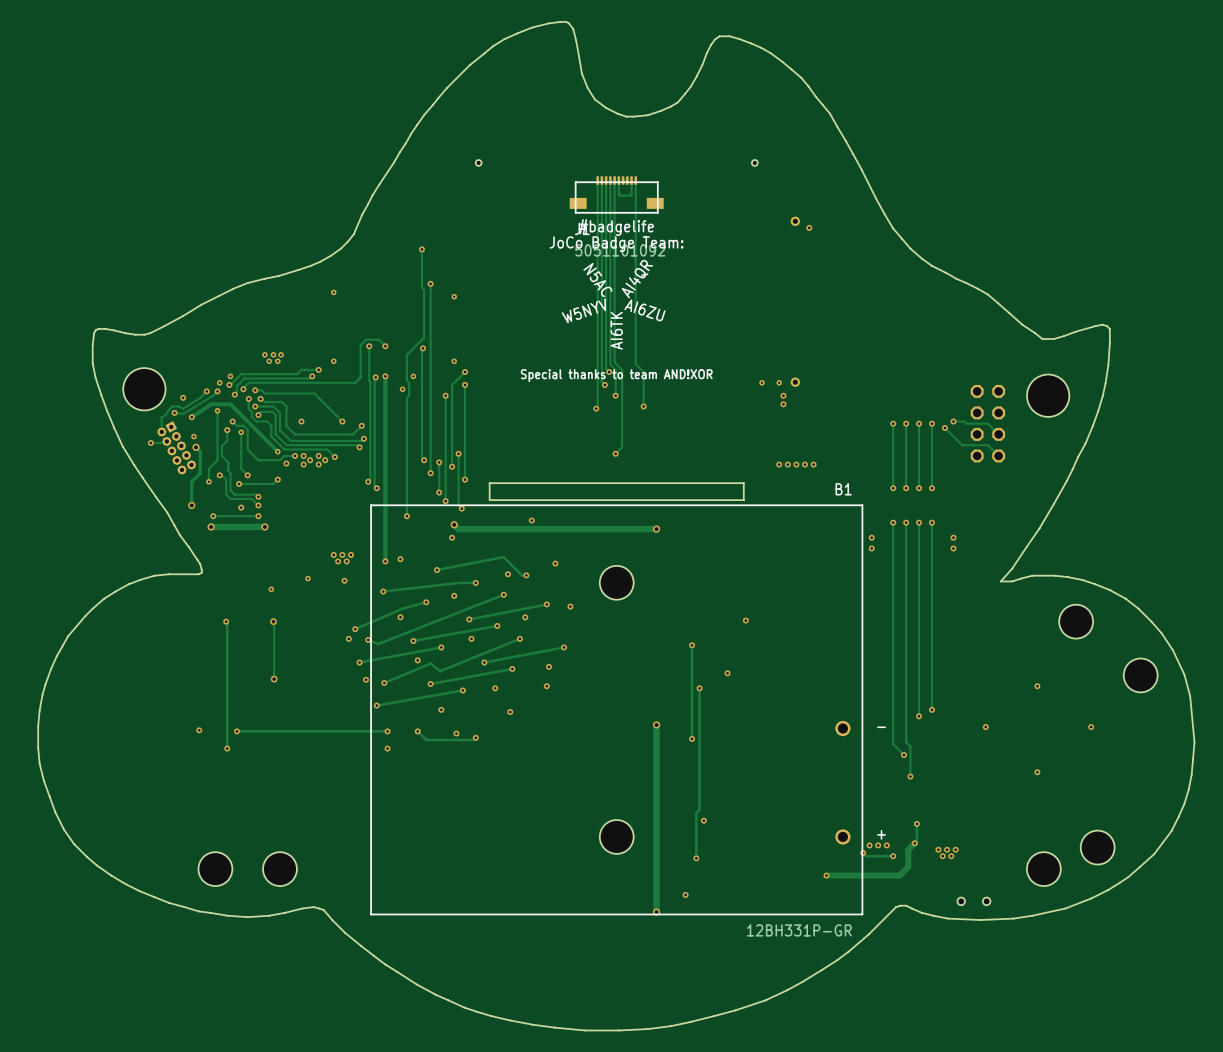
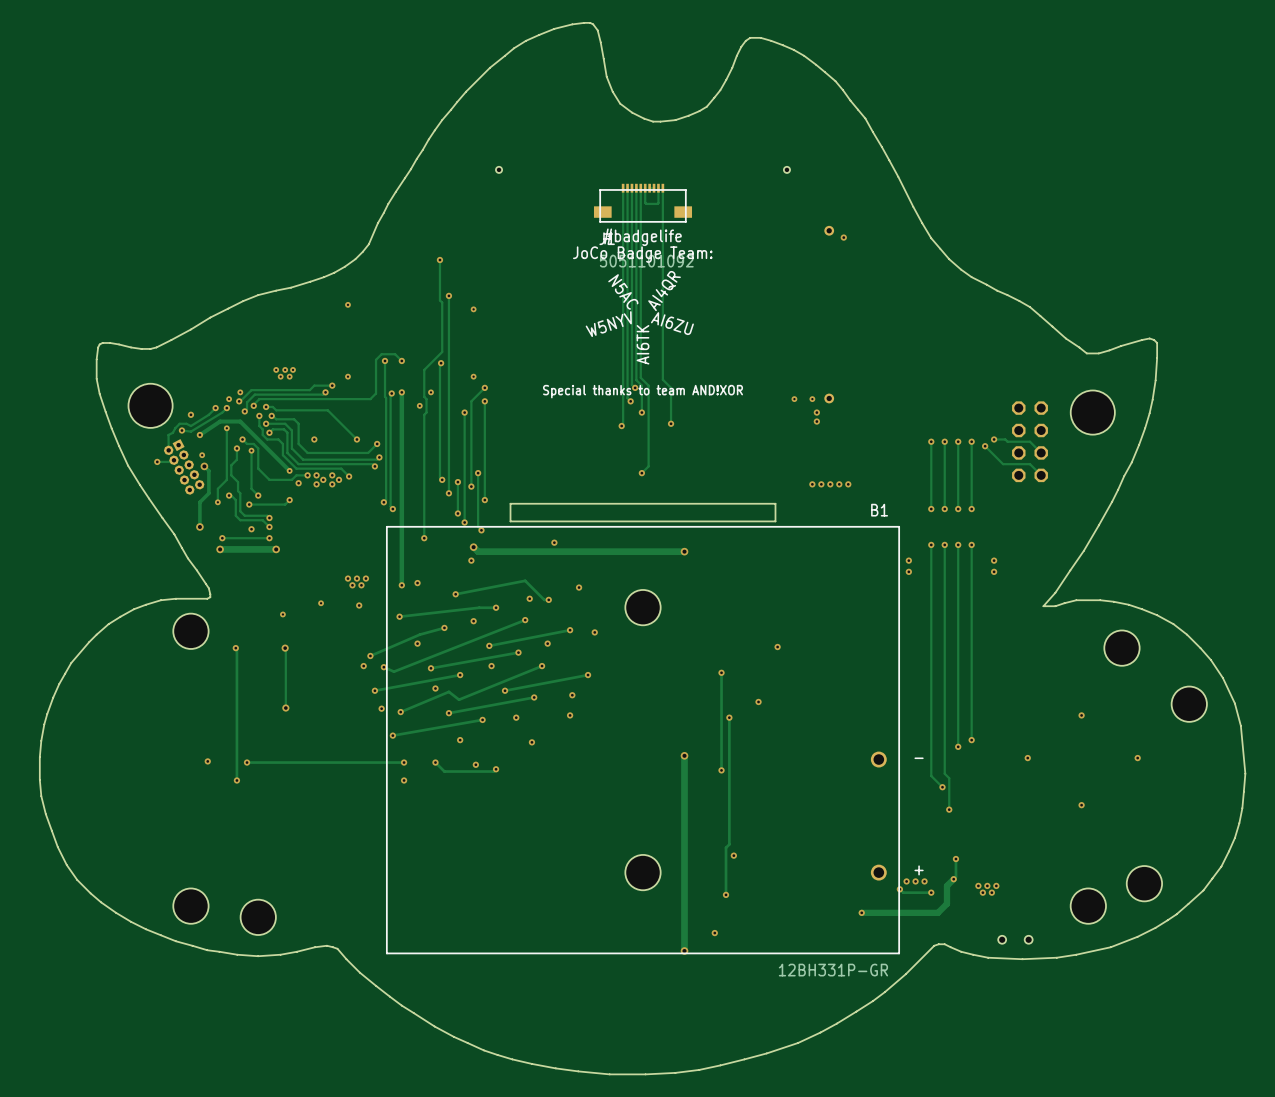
hole: none -> (190, 631)
hole: none -> (190, 906)
hole: (215, 869) -> none
hole: (279, 869) -> none
hole: none -> (258, 917)

